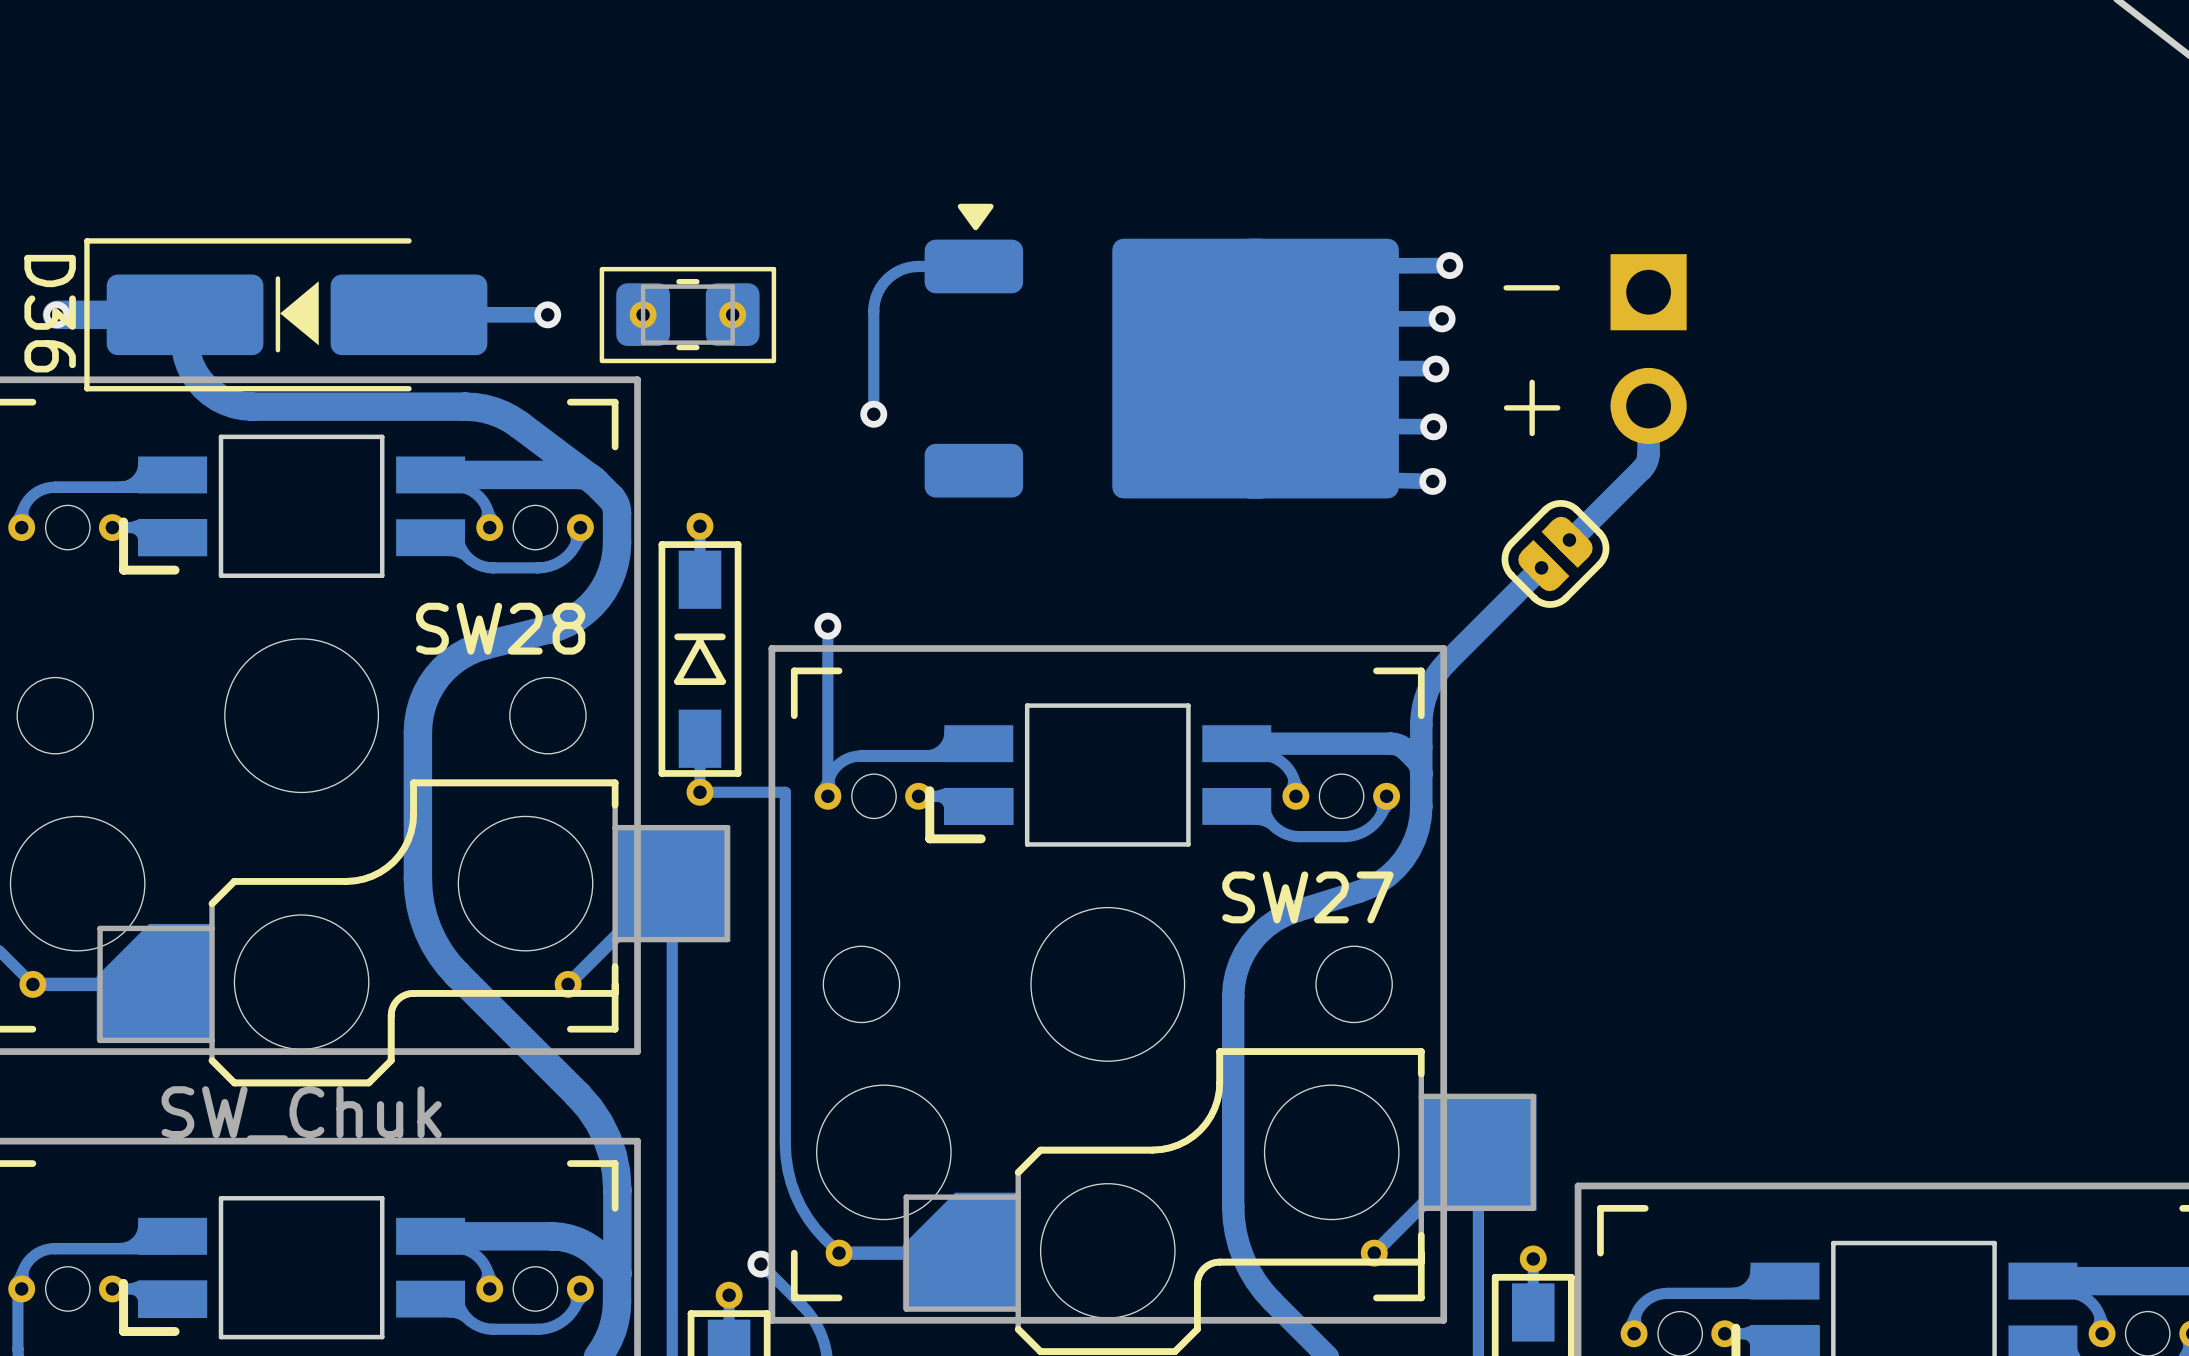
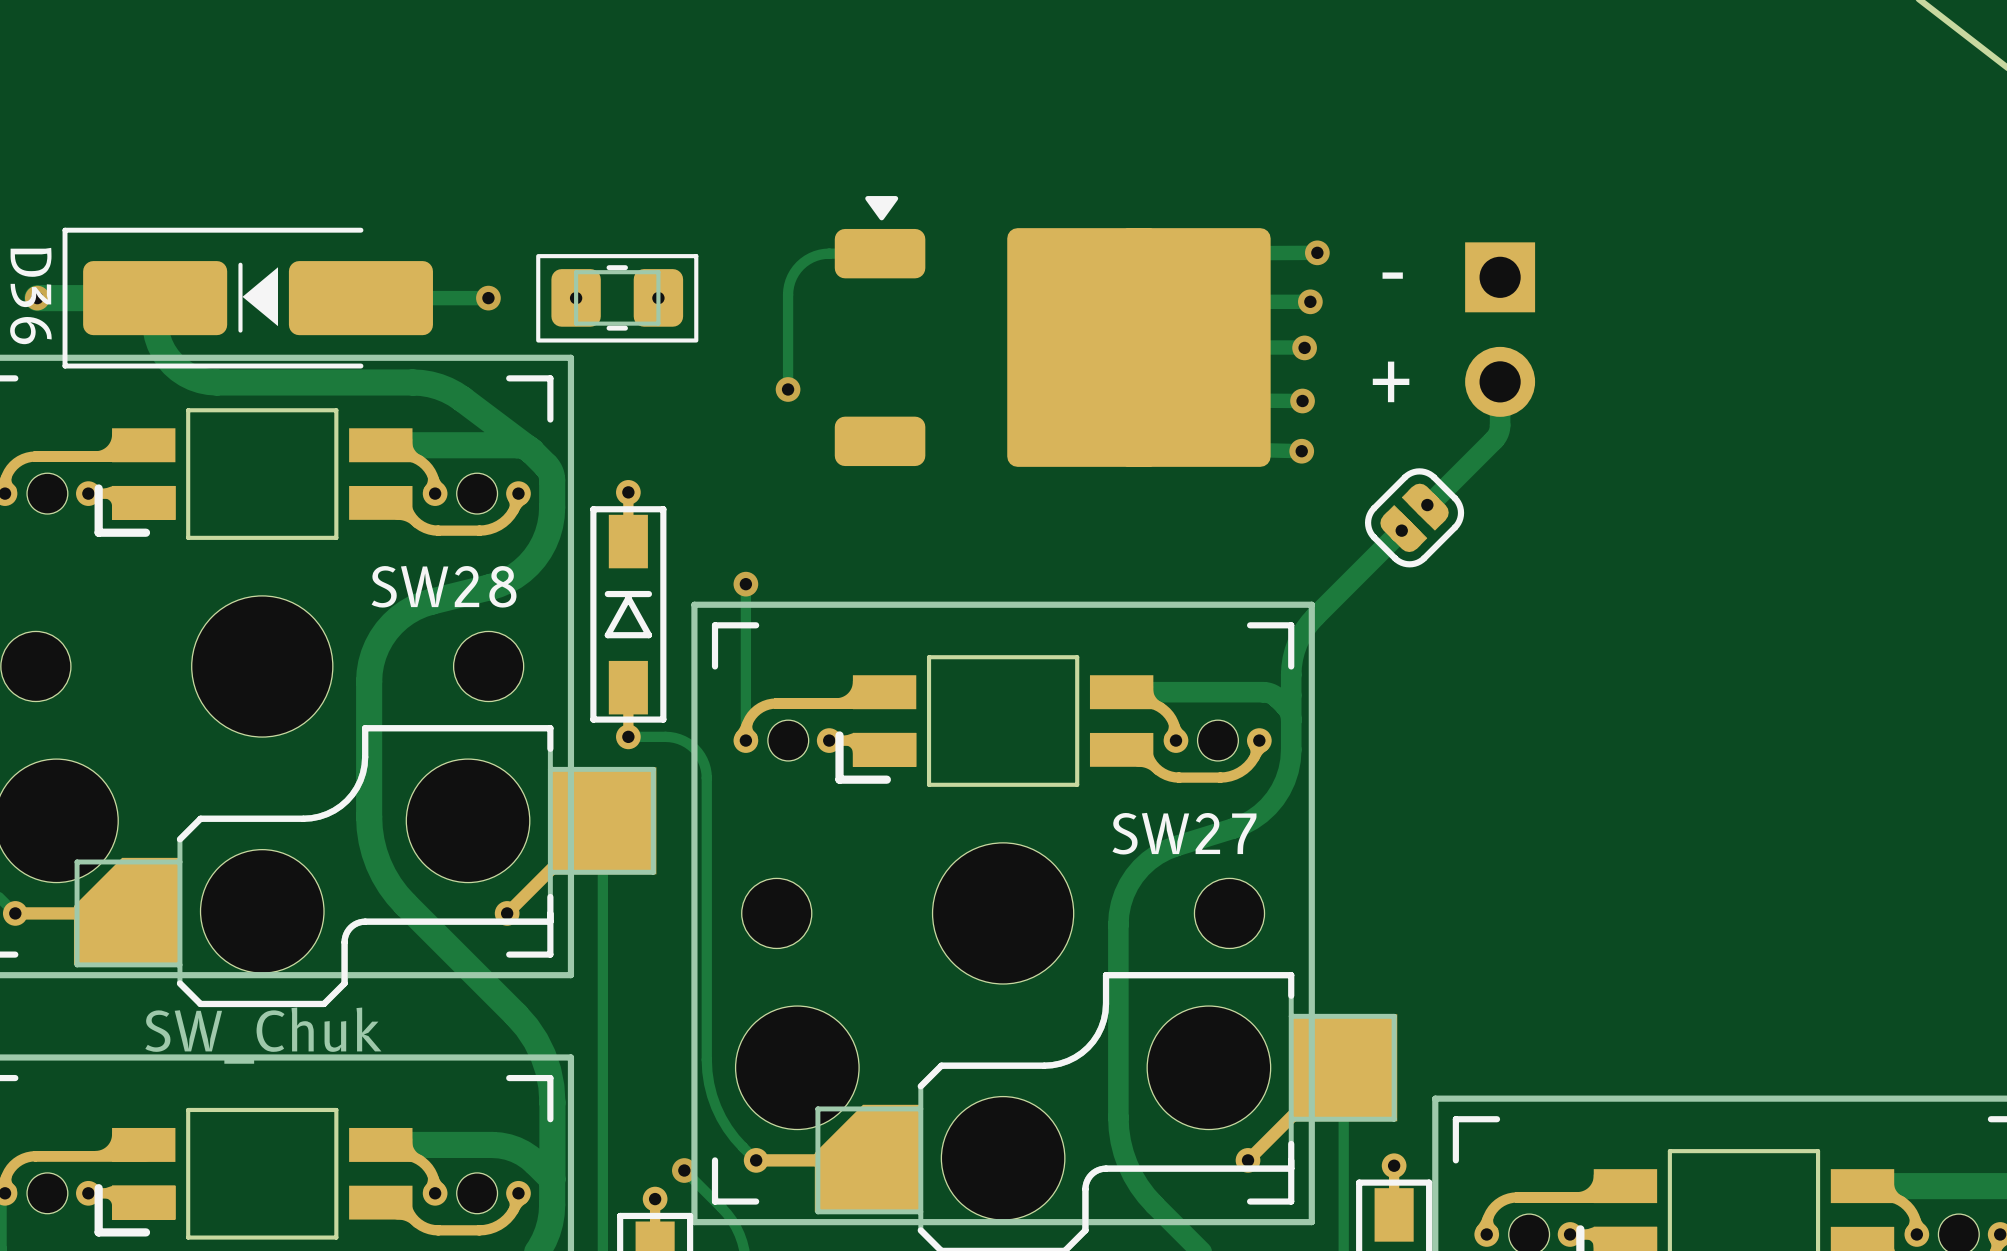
track: (740, 792) (785, 792) (785, 837) -> (665, 736) (679, 739) (694, 748) (704, 764) (706, 778)

